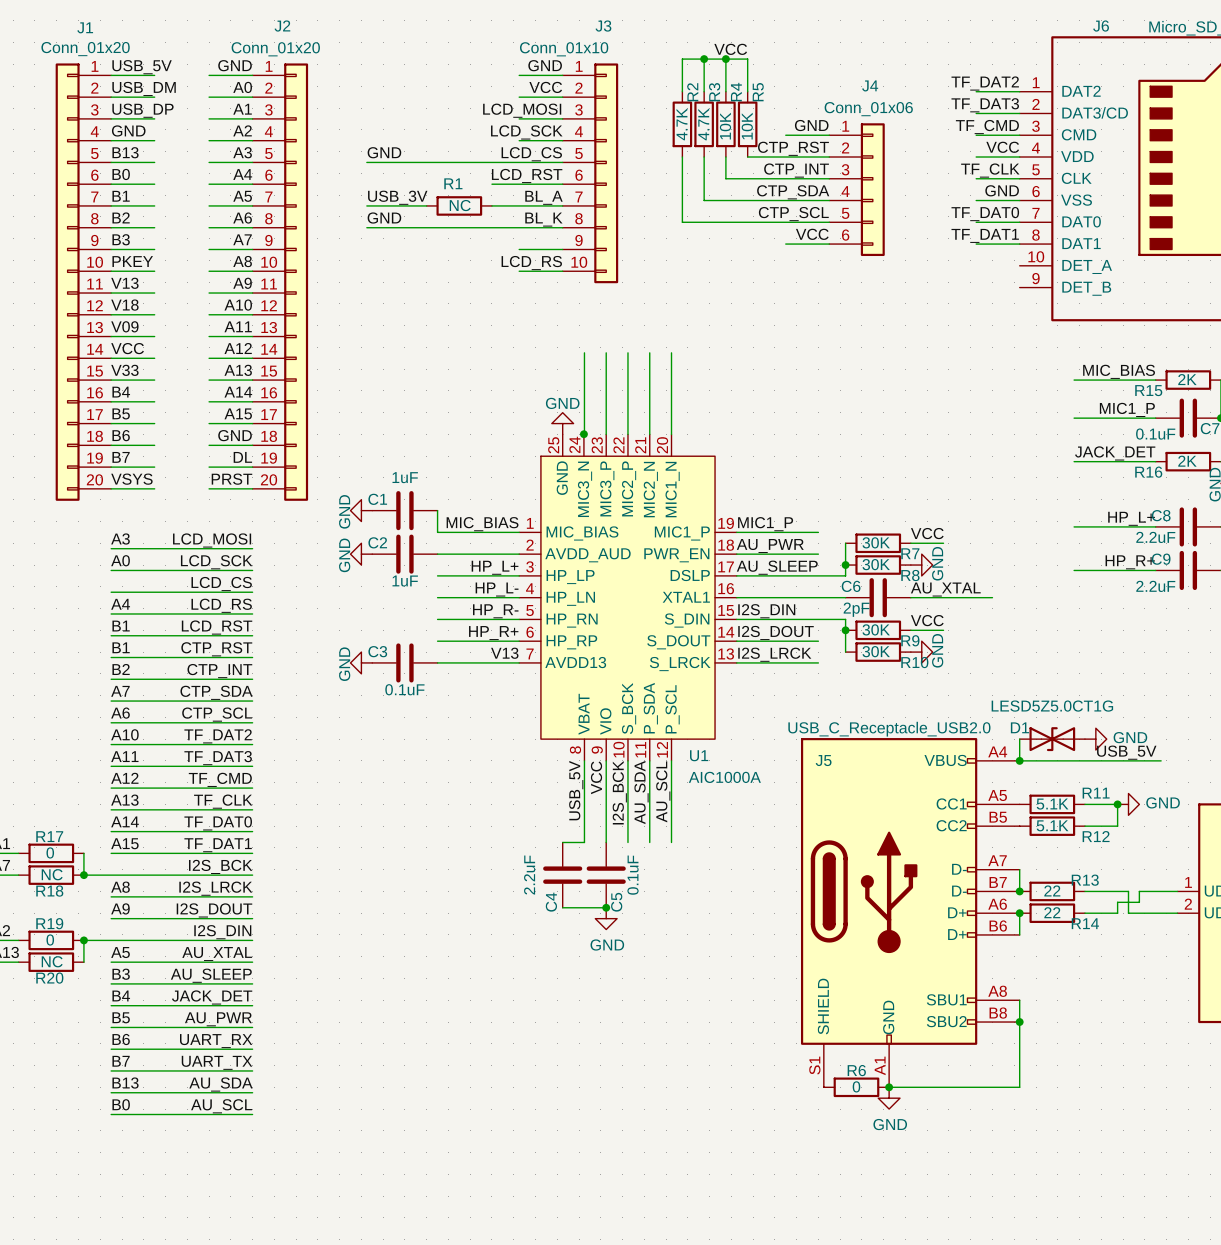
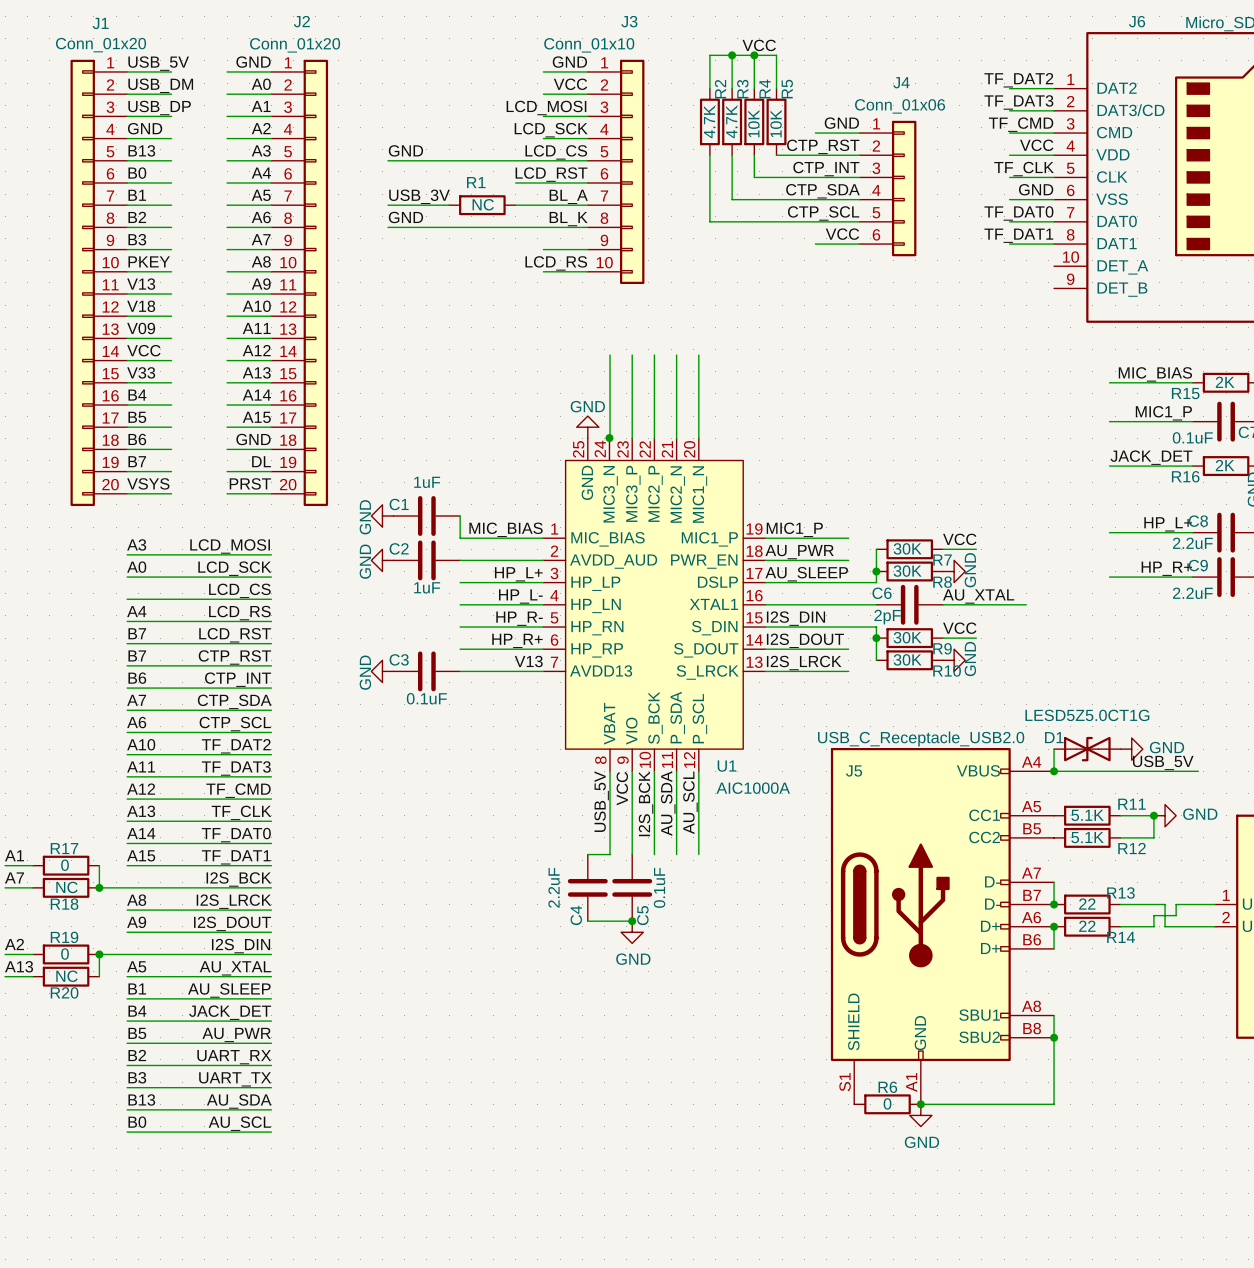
label: B1 (121, 626) -> B7 (137, 633)
label: B1 (121, 647) -> B7 (137, 655)
label: B2 (121, 669) -> B6 (137, 678)
label: B3 (121, 974) -> B1 (137, 988)
label: B6 (121, 1039) -> B2 (137, 1055)
label: B7 (121, 1061) -> B3 (137, 1077)

